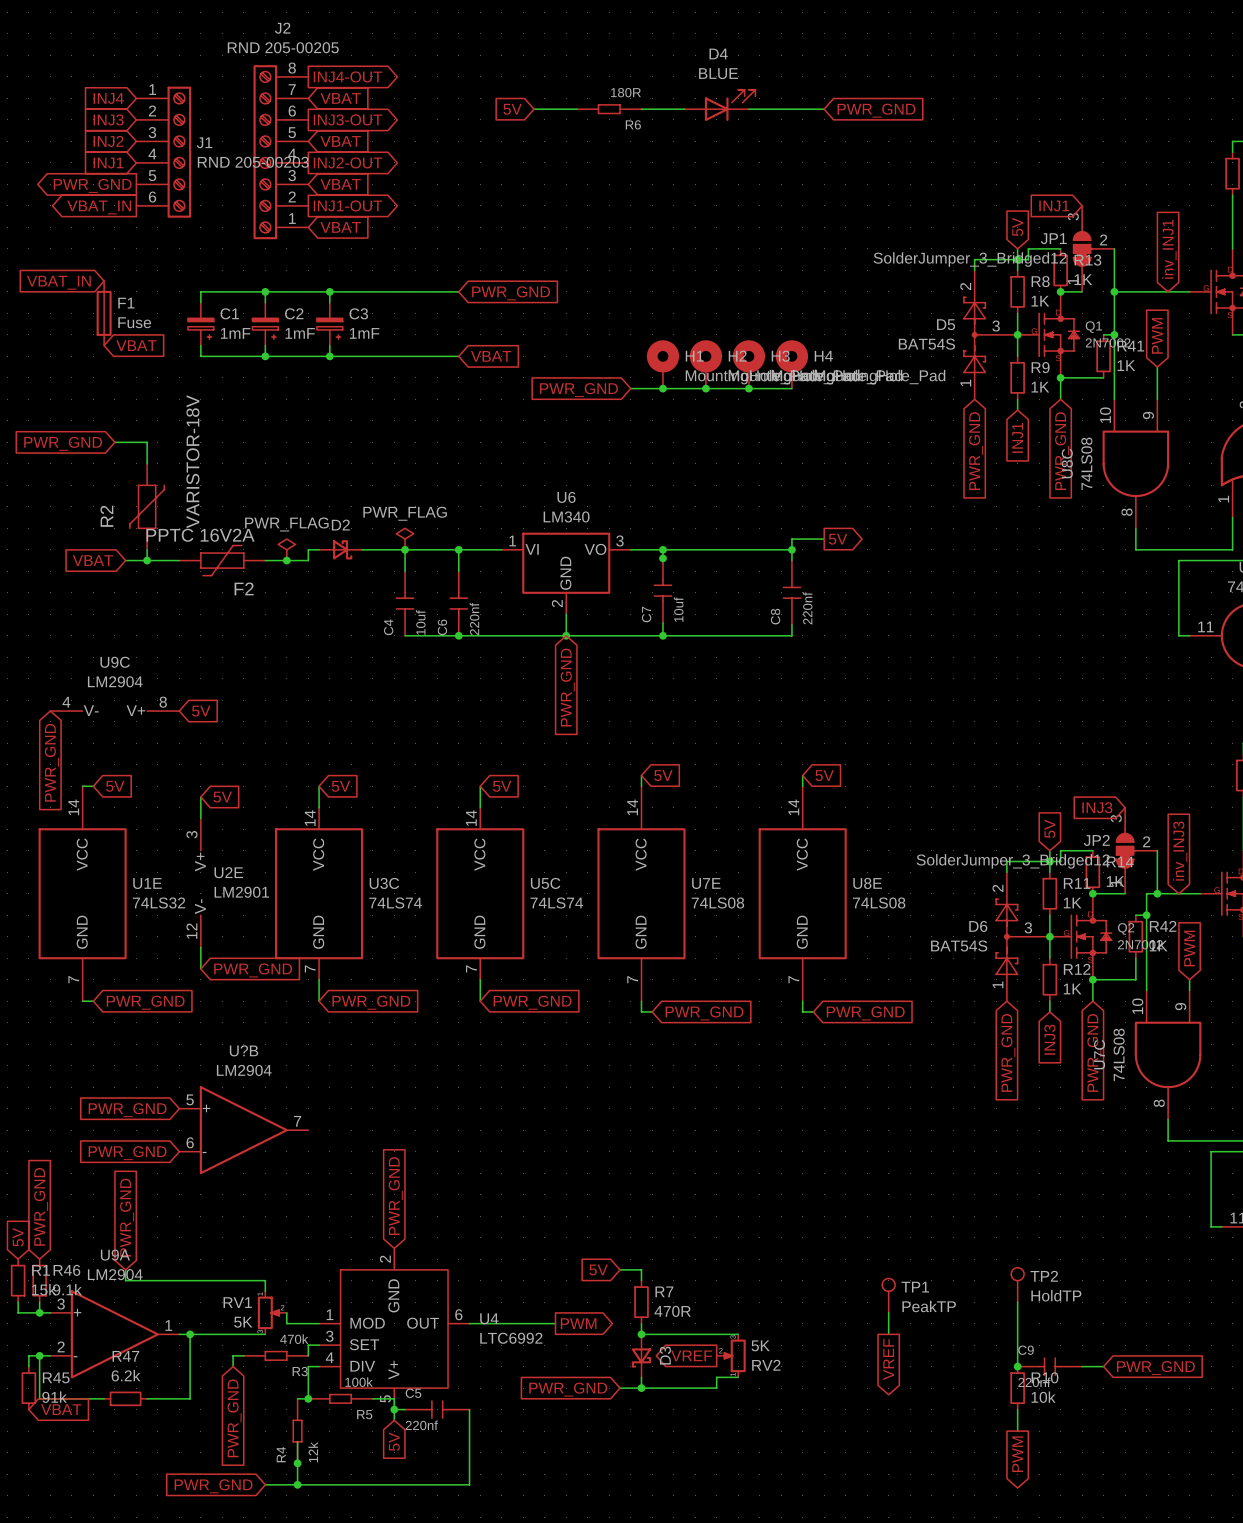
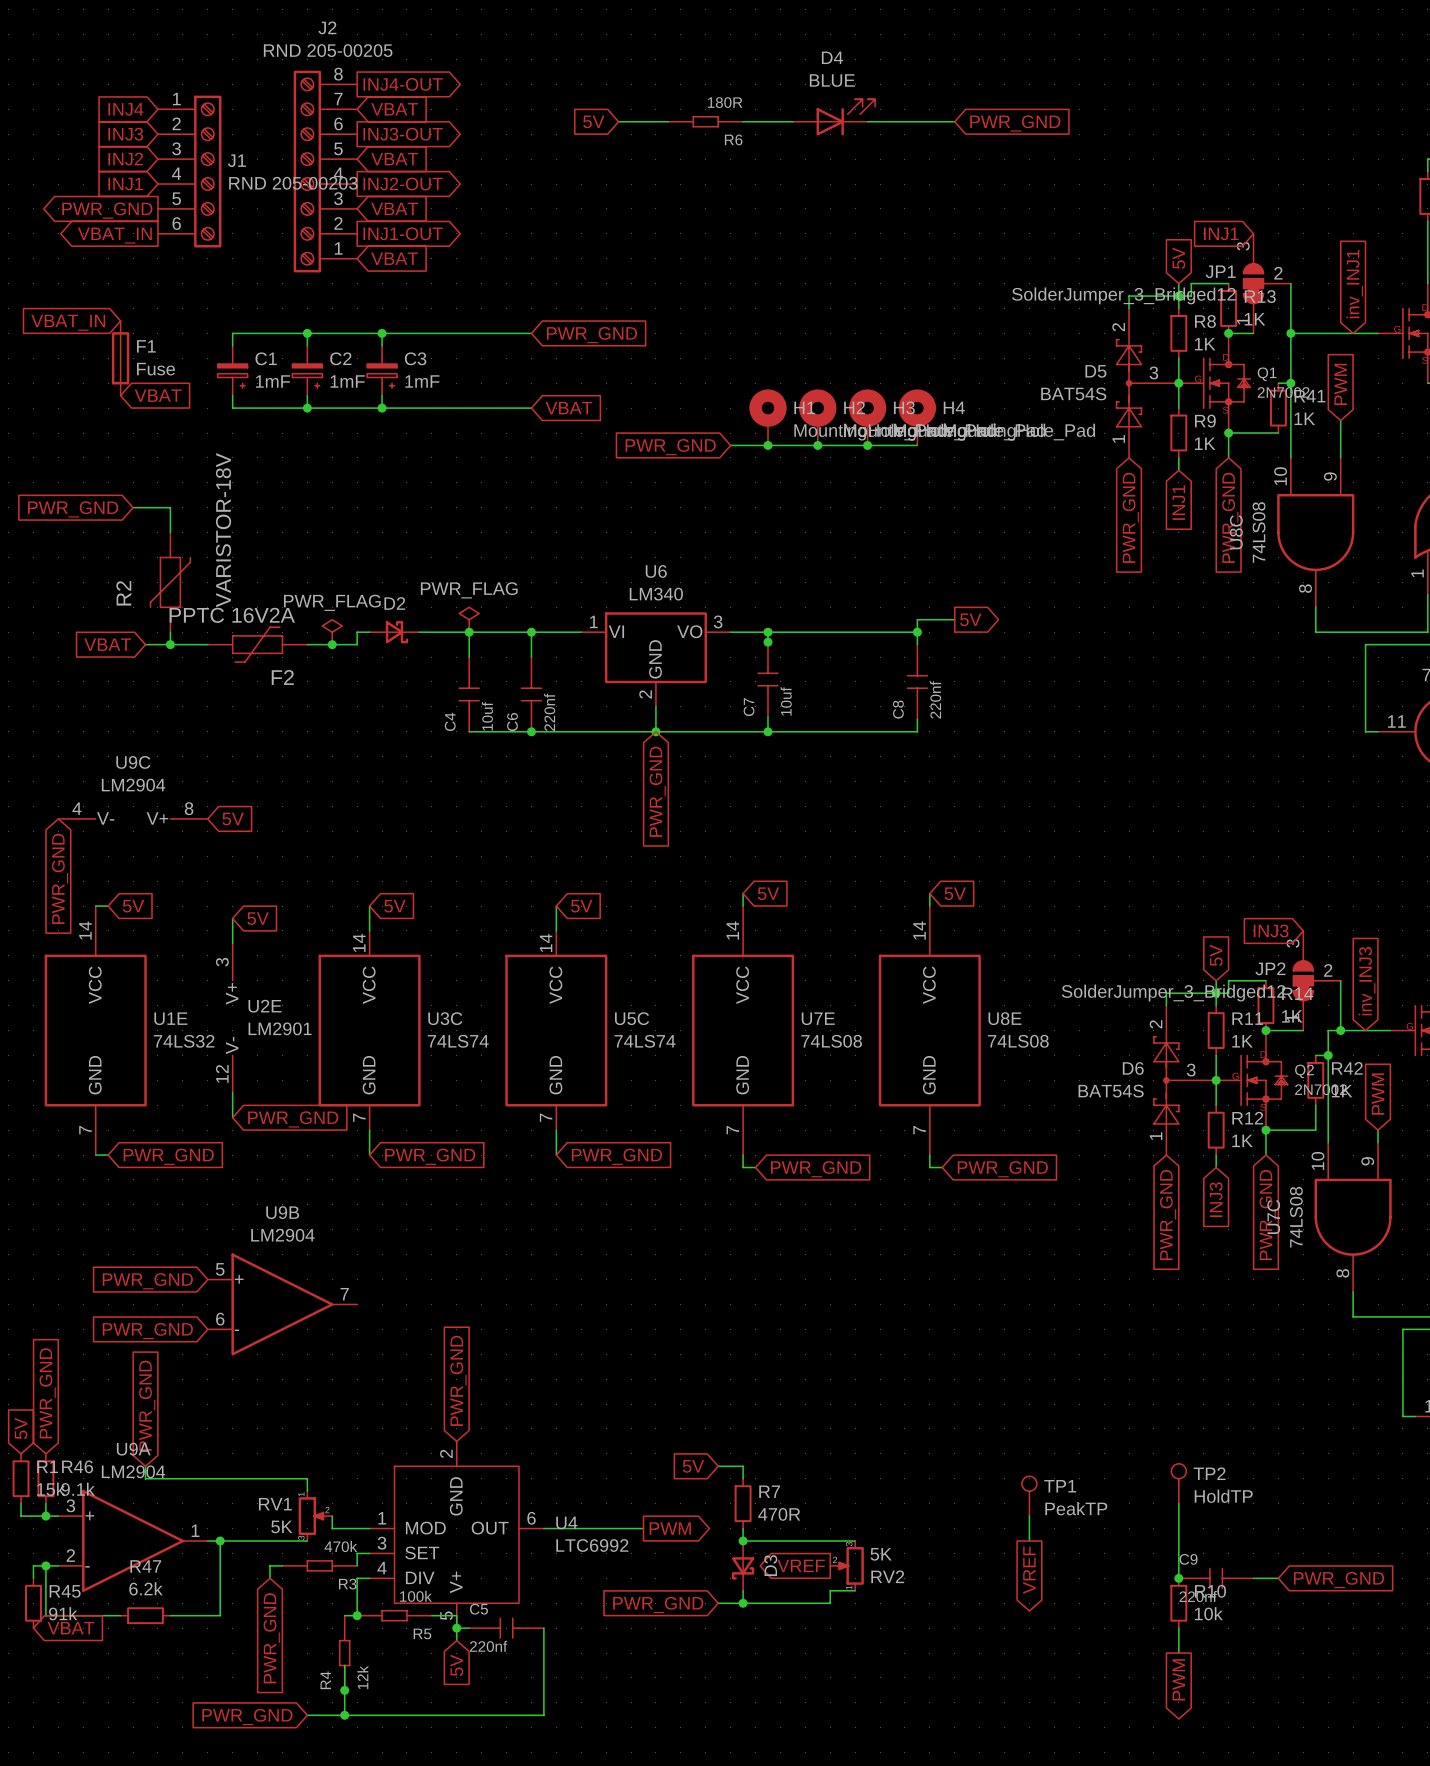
U?B name: U?B (244, 1050) -> U9B (282, 1212)

